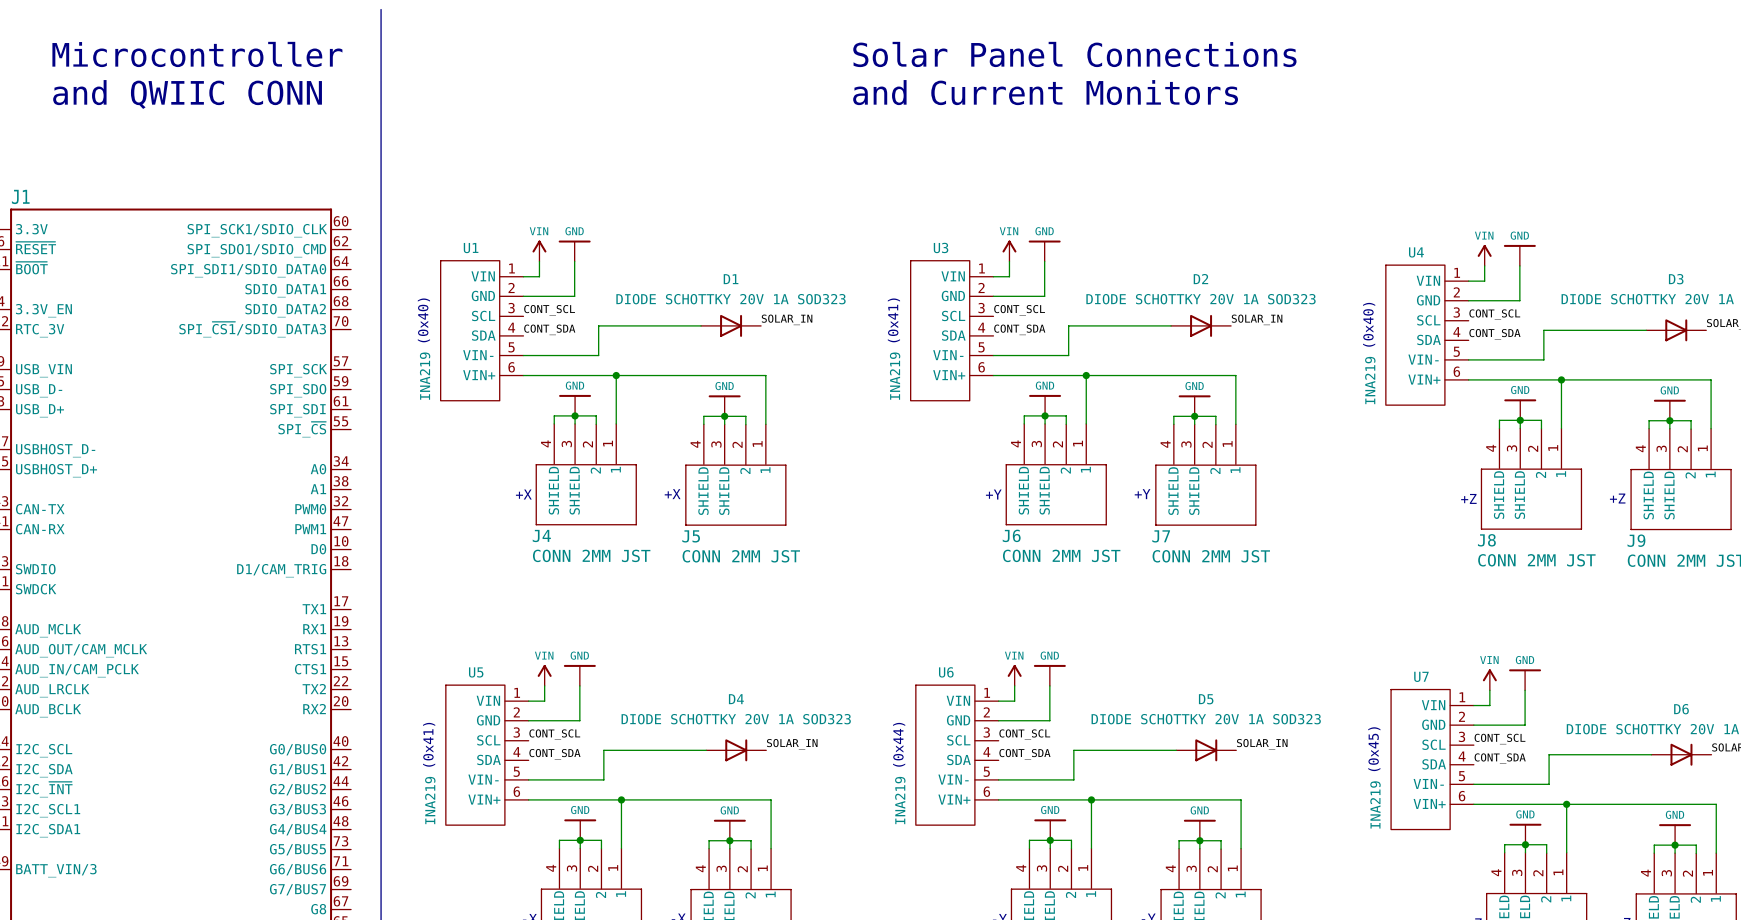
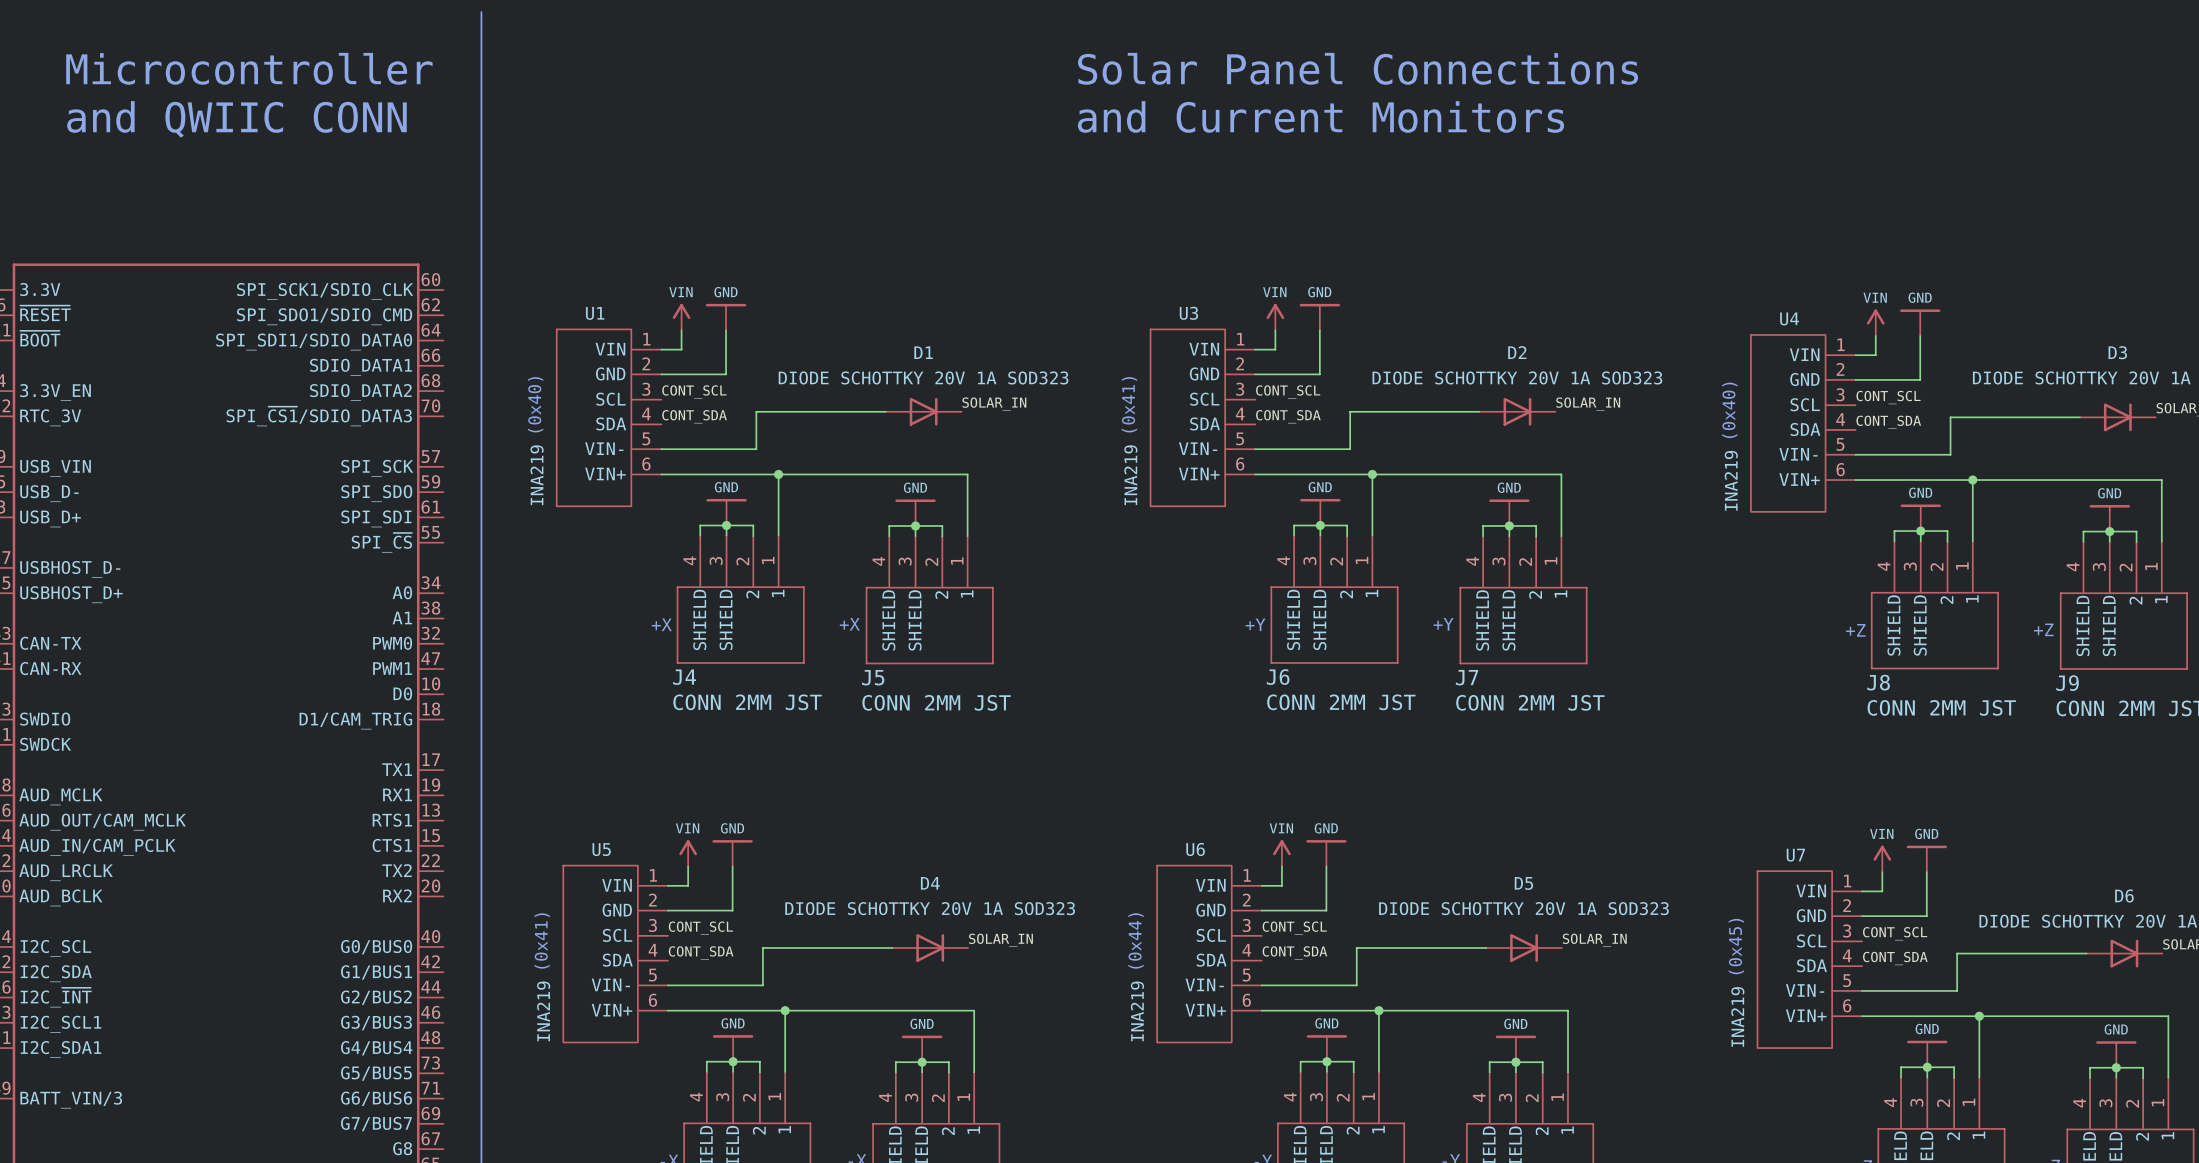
J1 name: J1 (20, 196) -> none

